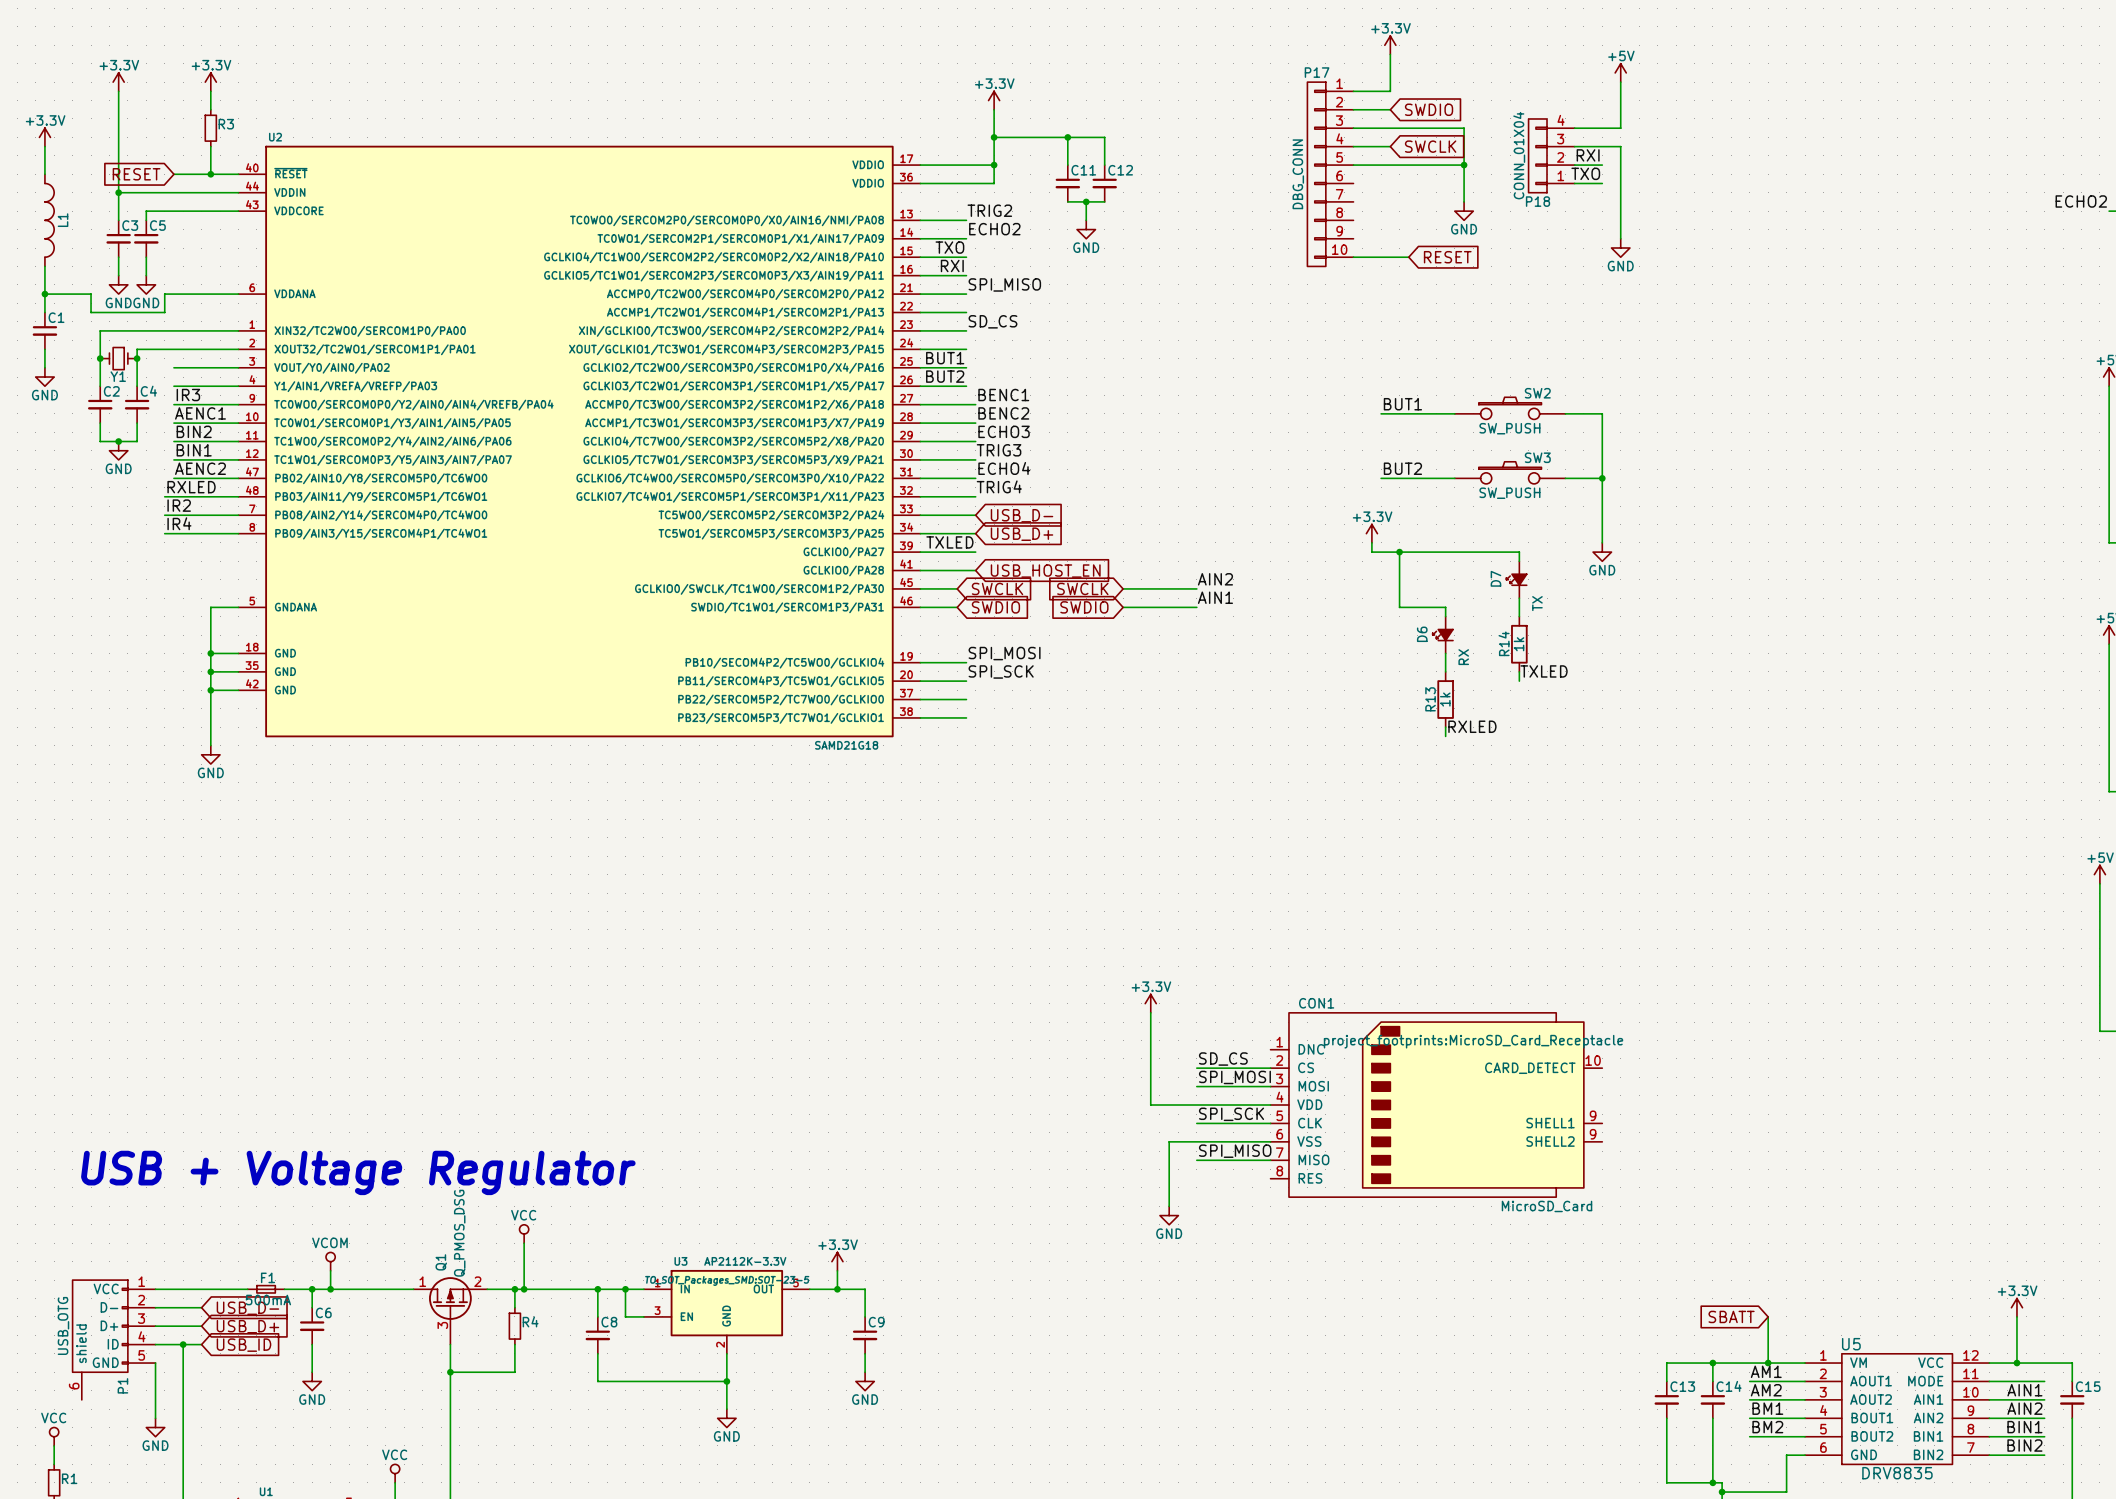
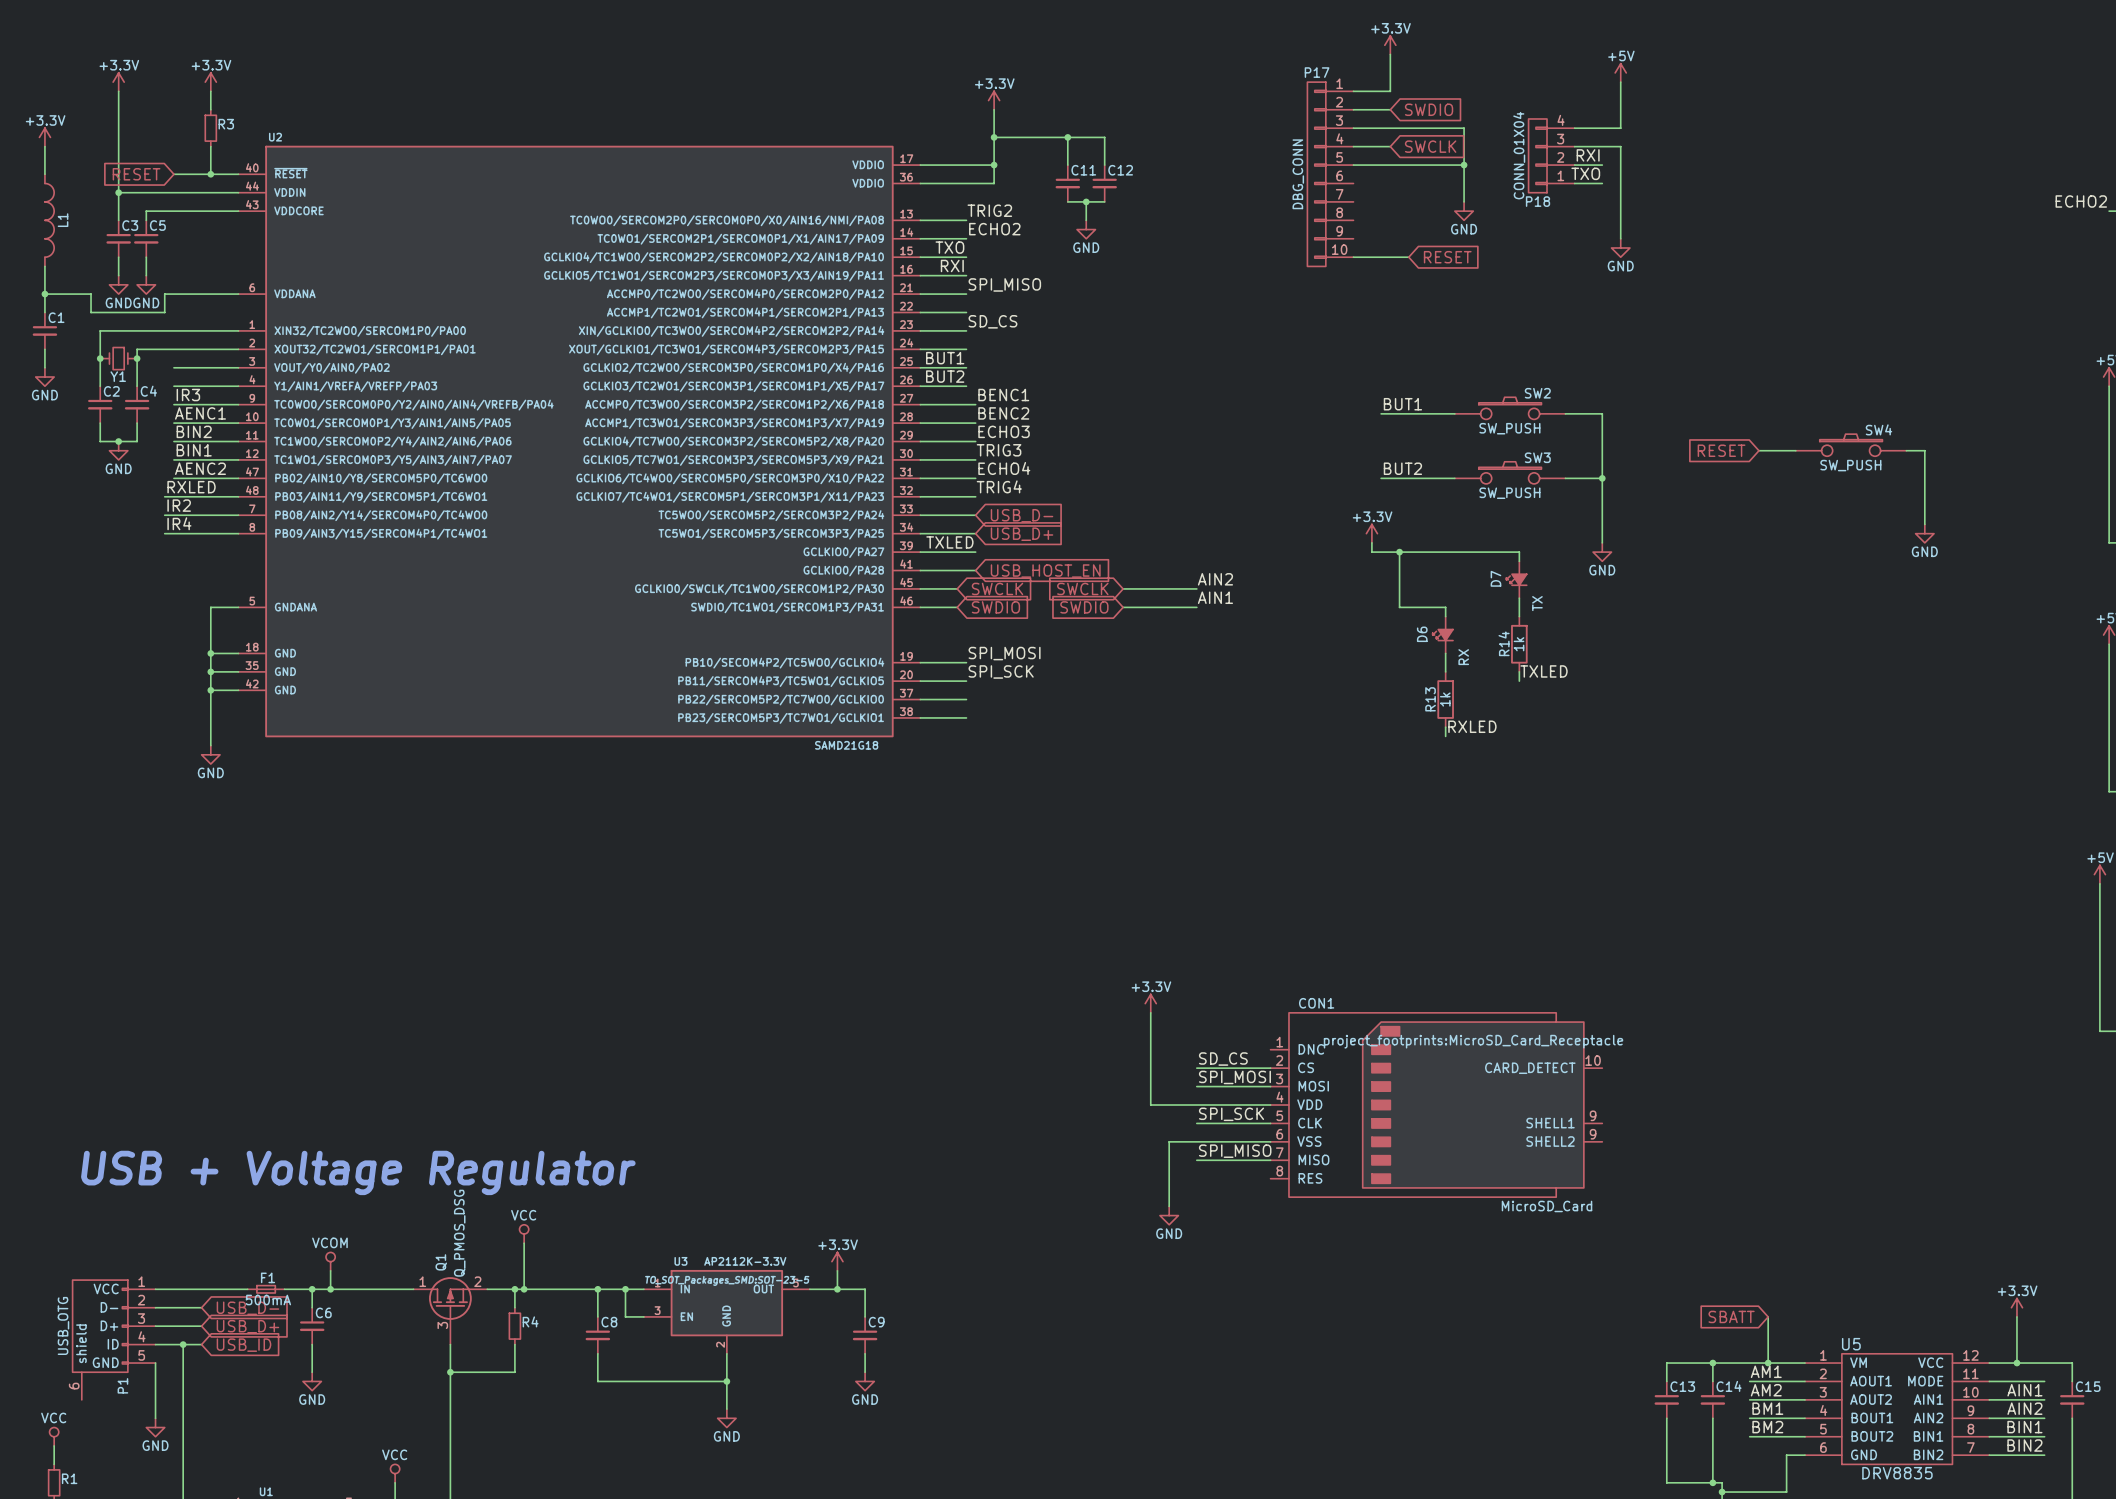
SW4: none -> SW_PUSH (1851, 445)
global label: none -> RESET (1721, 450)
wire: none -> (1758, 450) (1795, 450)
wire: none -> (1906, 450) (1924, 450) (1924, 524)
power symbol: none -> GND (1924, 533)

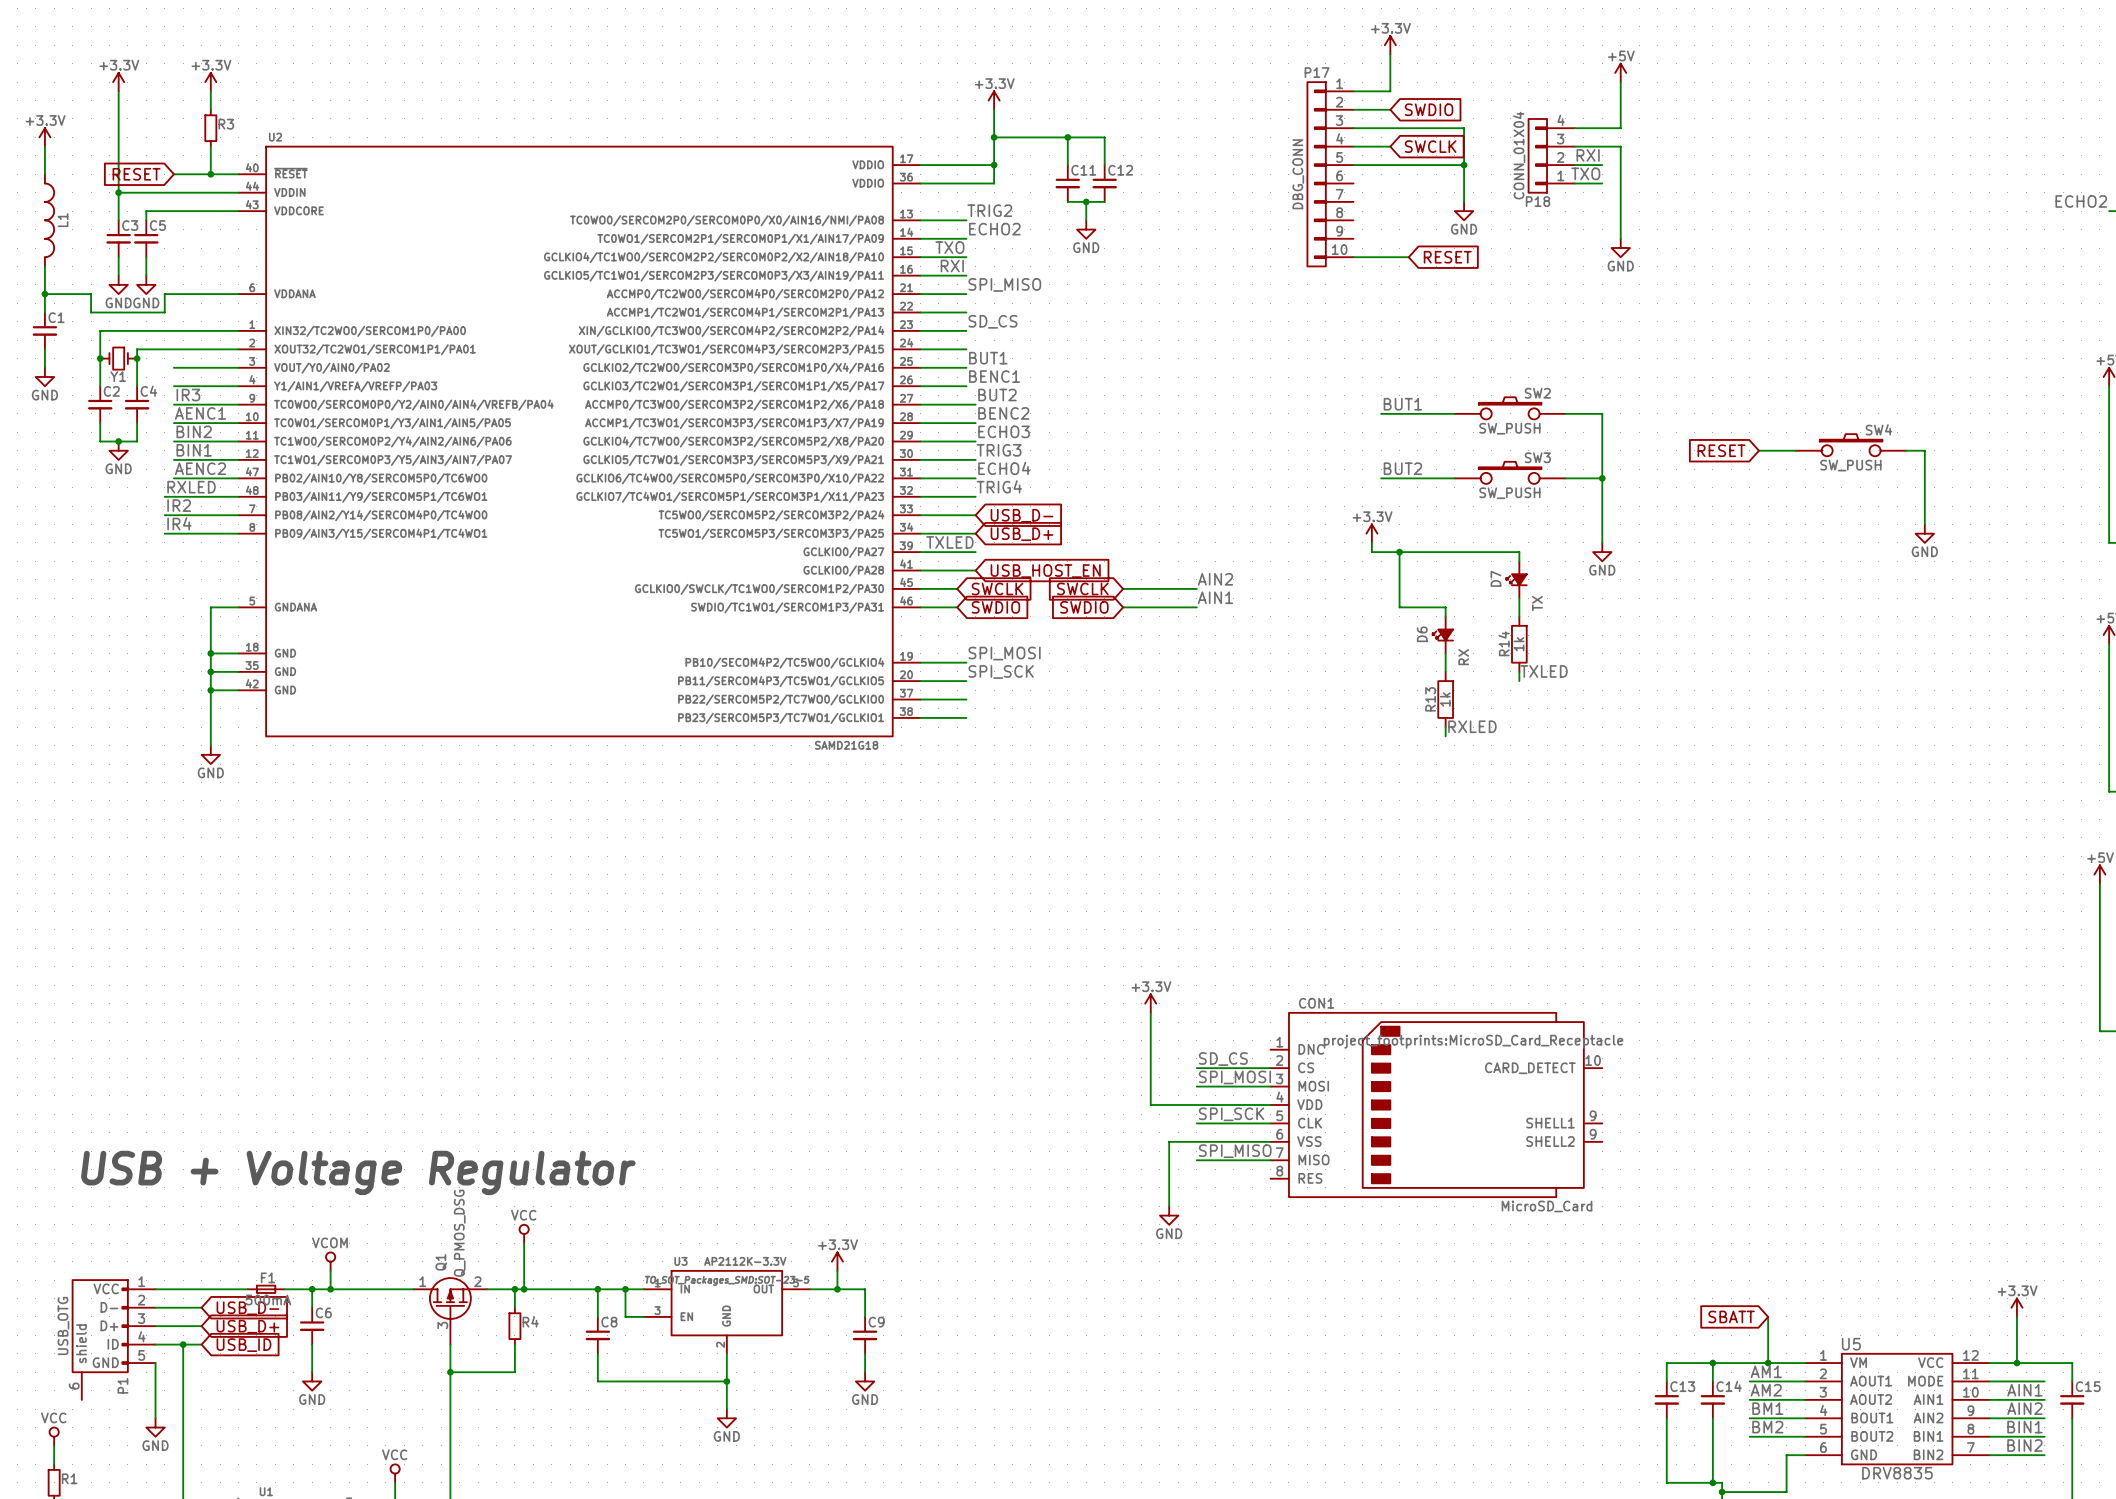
label position: BUT1 (945, 358) -> BUT1 (988, 358)
label: BUT2 (945, 376) -> BENC1 (994, 376)
label: BENC1 (1003, 395) -> BUT2 (997, 395)

